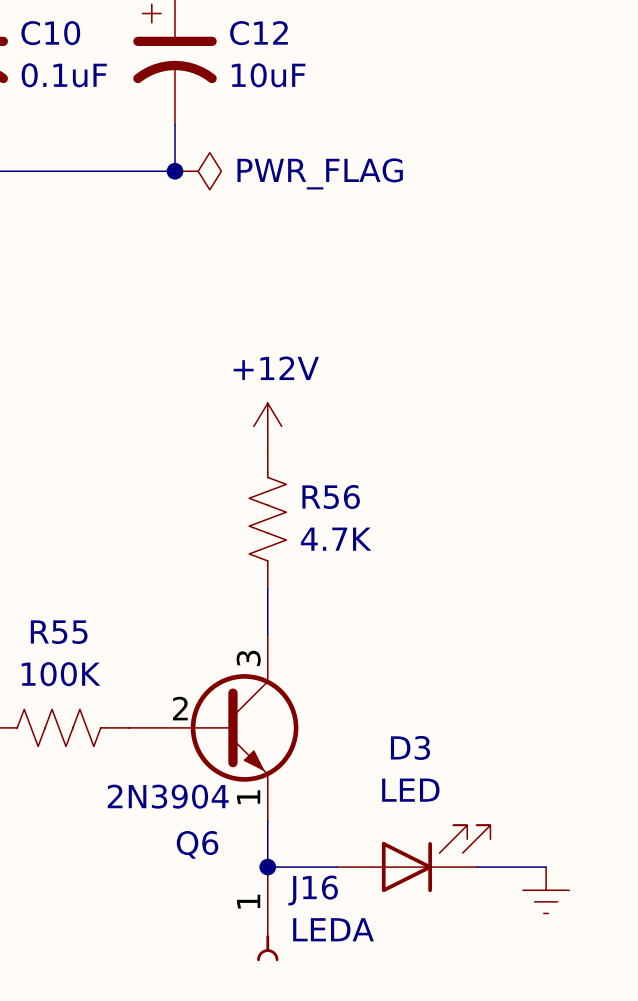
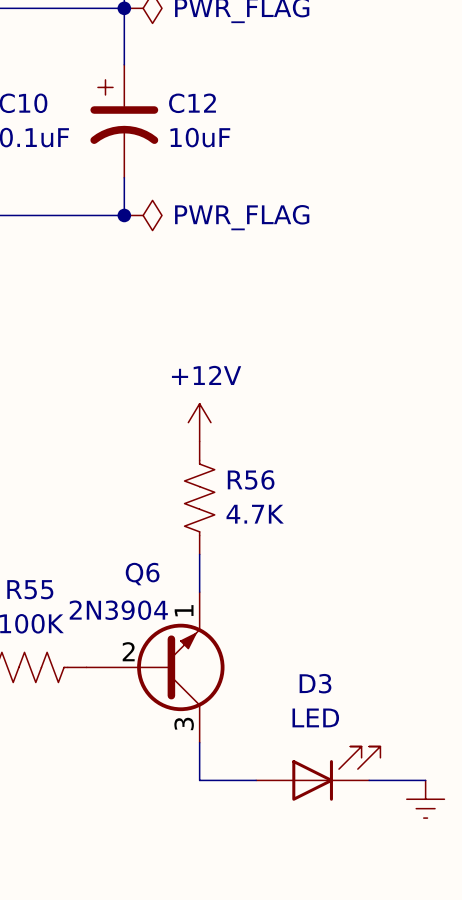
Q6 flip: as is (244, 727) -> up-down (180, 667)
junction: (267, 867) -> none
J16: LEDA (267, 914) -> none

